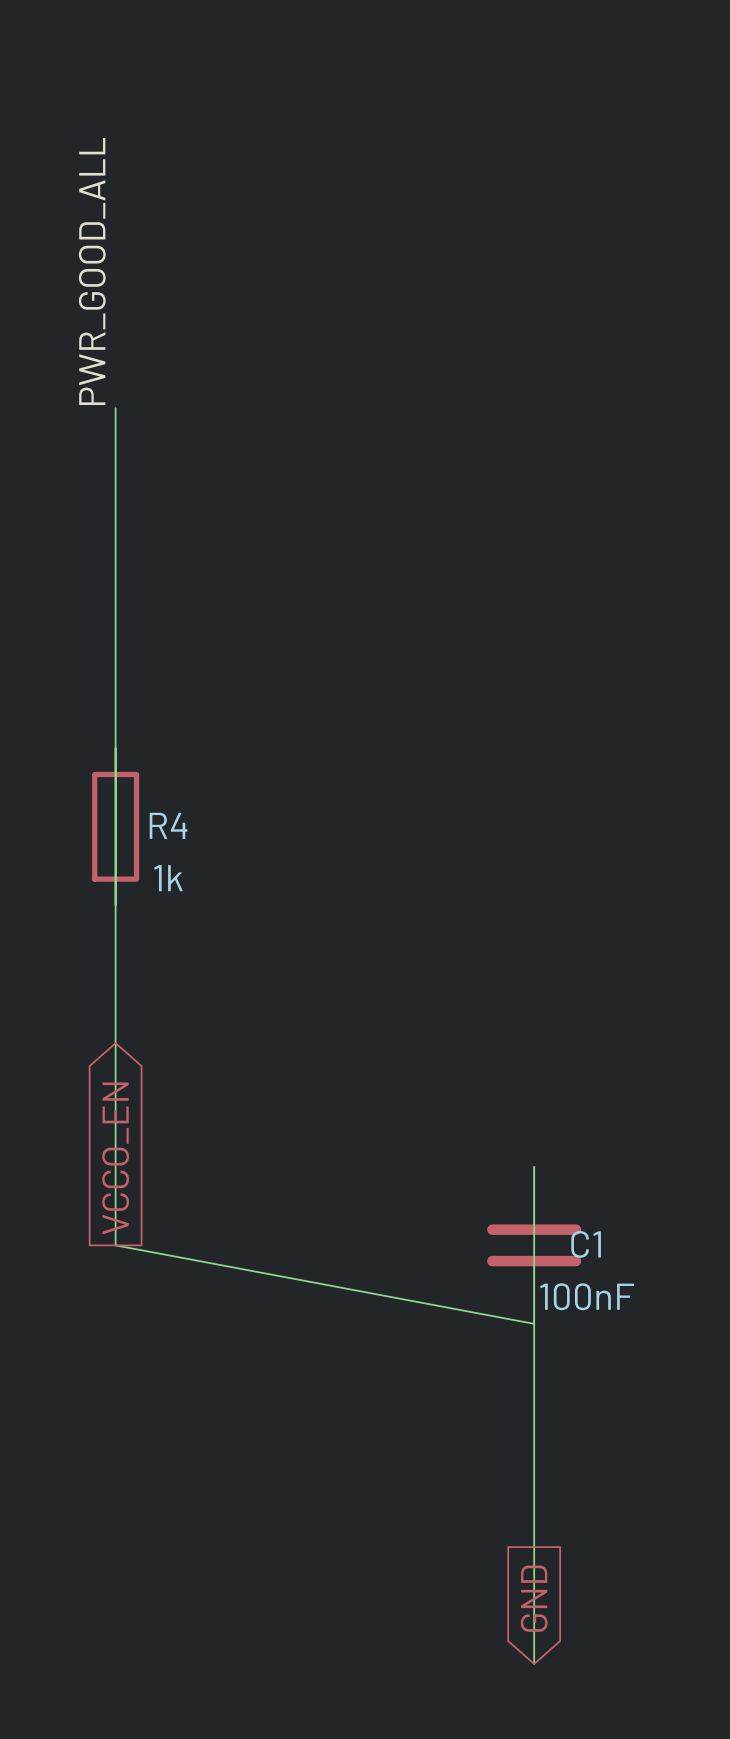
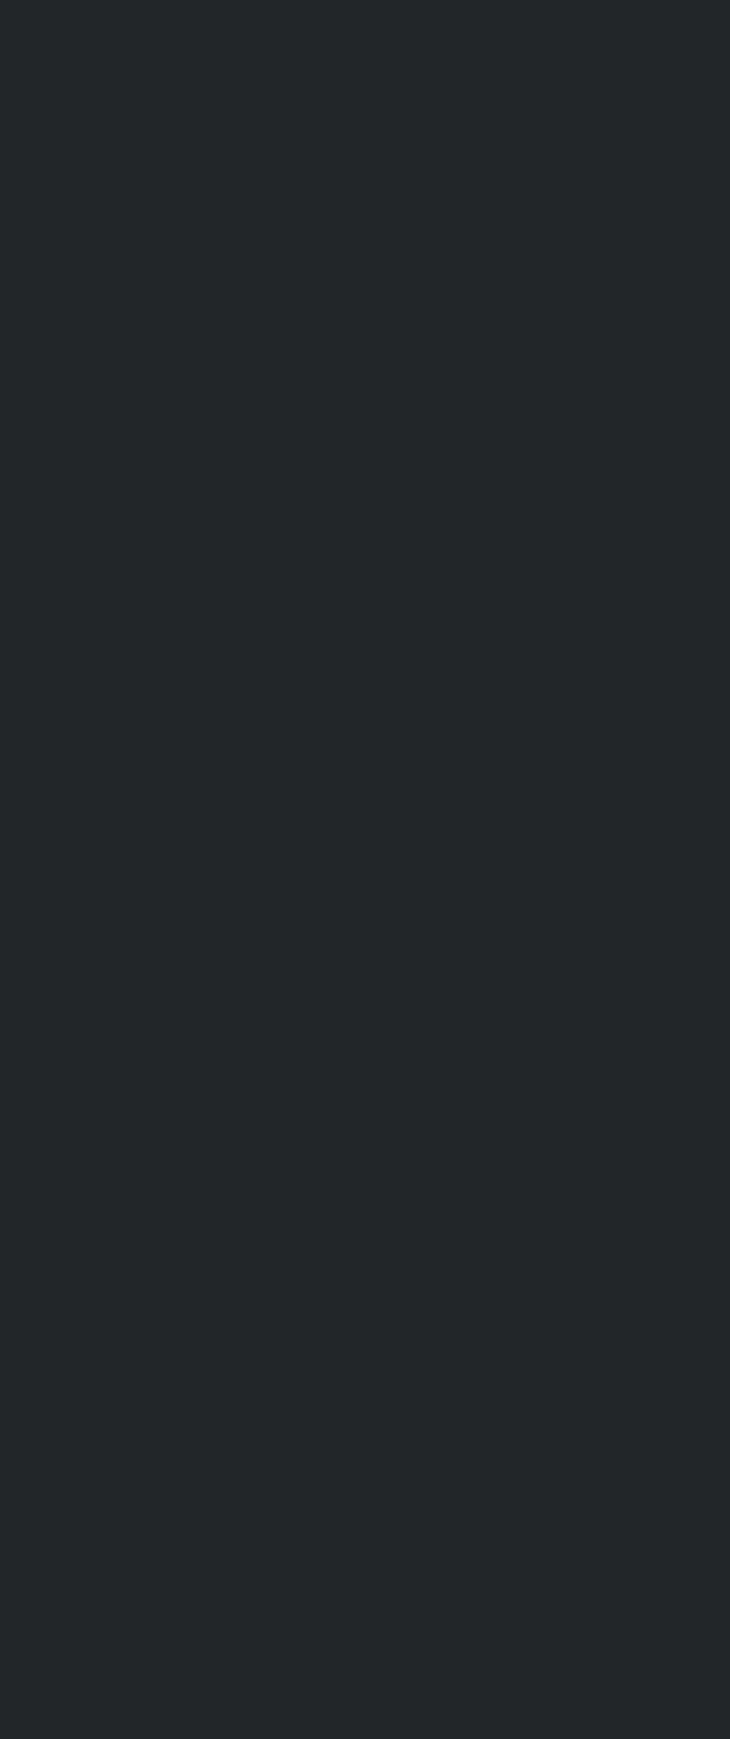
label: PWR_GOOD_ALL (92, 271) -> none
wire: (115, 408) (115, 1245) (534, 1323) -> none
R4: 1k (115, 826) -> none
global label: VCCO_EN (115, 1158) -> none
wire: (534, 1166) (534, 1663) -> none
C1: 100nF (534, 1245) -> none
global label: GND (534, 1598) -> none

